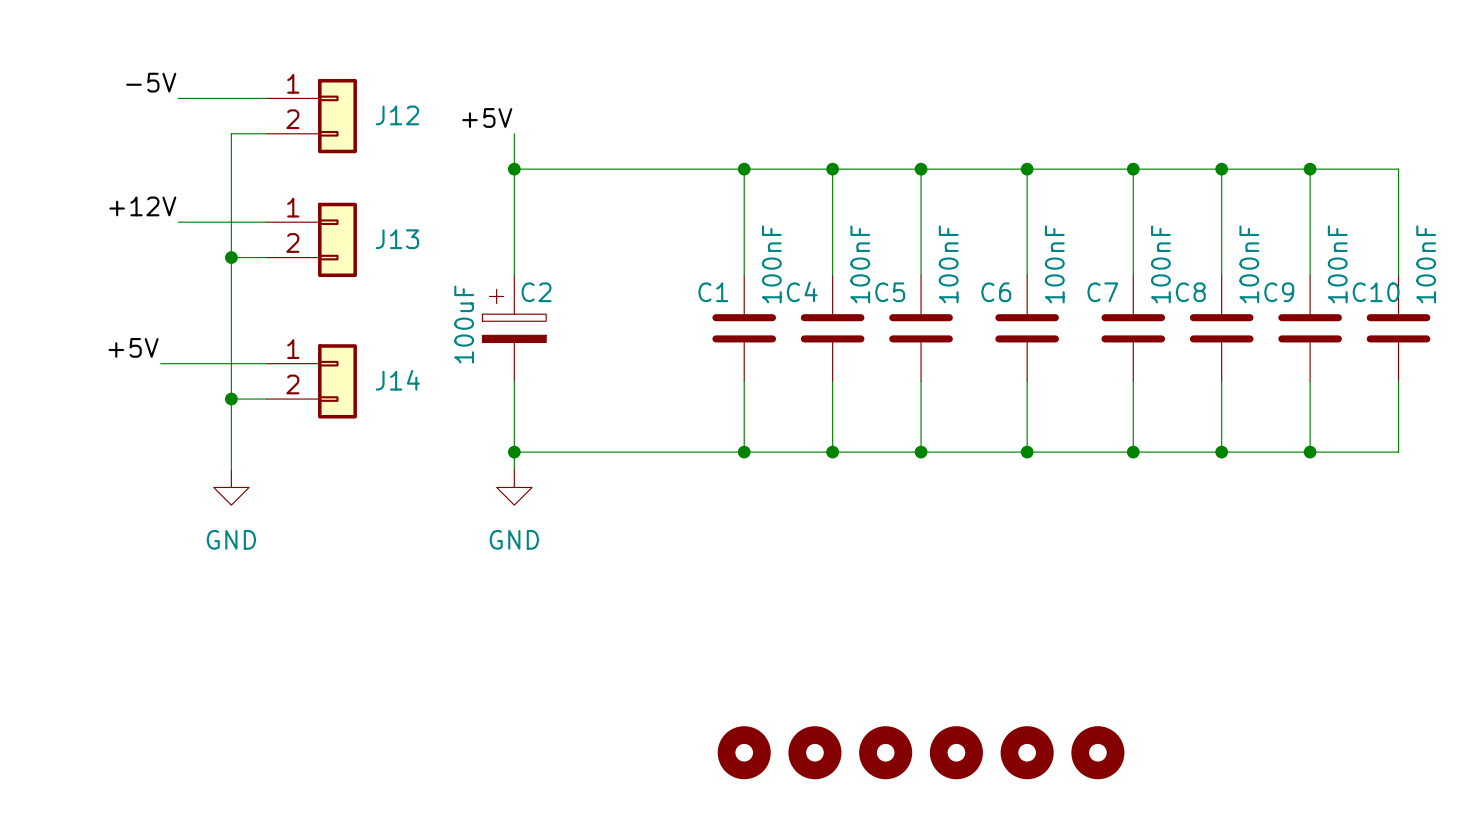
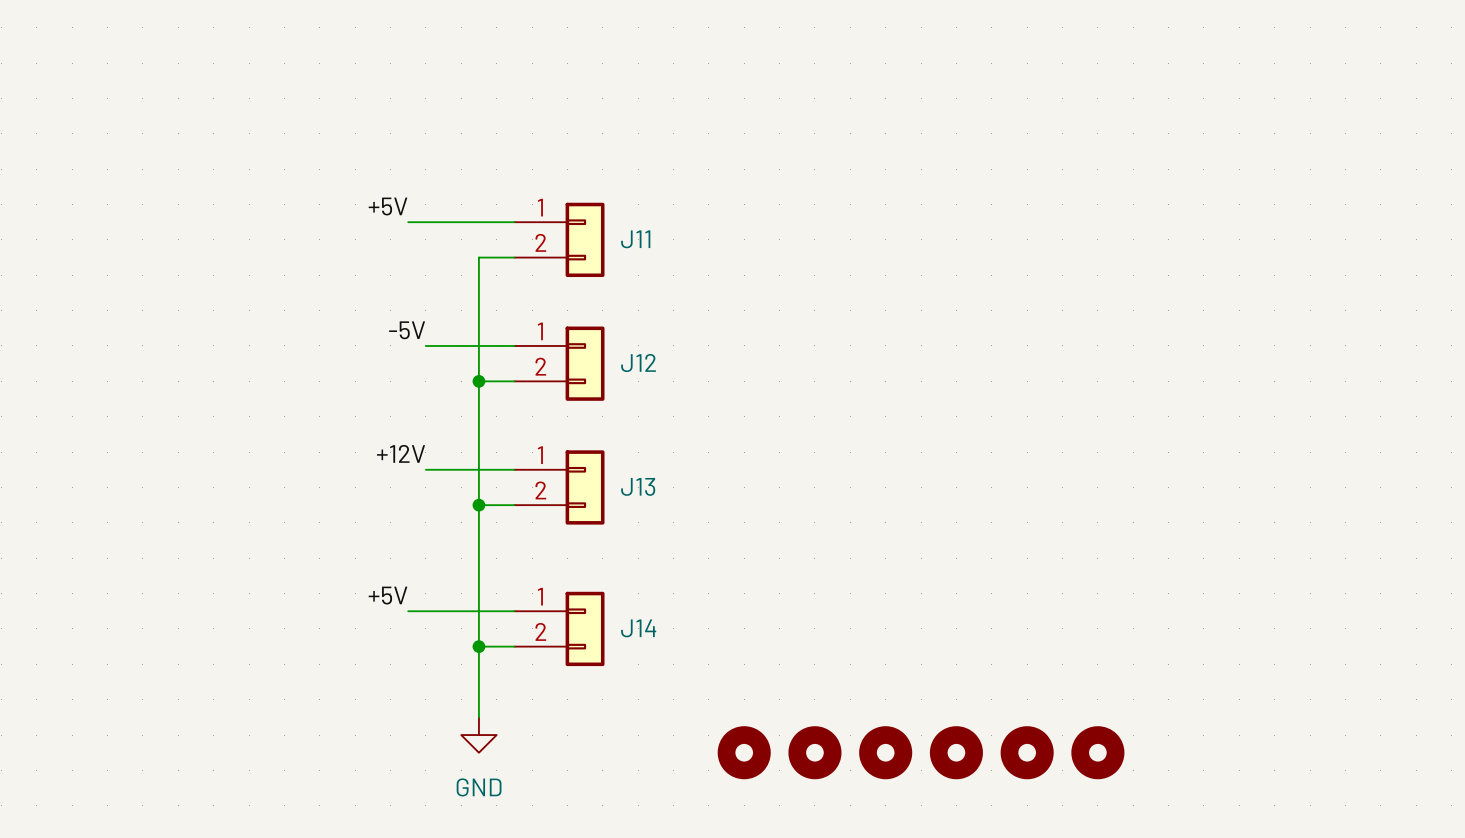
label: -5V (151, 82) -> none
wire: (178, 98) (266, 98) -> none
J12 position: (311, 116) -> (559, 363)
label position: +5V (487, 118) -> +5V (388, 206)
wire: (266, 133) (231, 133) (231, 469) -> none
wire: (514, 133) (514, 275) -> none
wire: (514, 169) (1398, 169) (1398, 275) -> none
junction: (514, 169) -> none
wire: (744, 169) (744, 275) -> none
junction: (744, 169) -> none
wire: (832, 169) (832, 275) -> none
junction: (832, 169) -> none
wire: (921, 169) (921, 275) -> none
junction: (921, 169) -> none
wire: (1027, 169) (1027, 275) -> none
junction: (1027, 169) -> none
wire: (1133, 169) (1133, 275) -> none
junction: (1133, 169) -> none
wire: (1221, 169) (1221, 275) -> none
junction: (1221, 169) -> none
wire: (1310, 169) (1310, 275) -> none
junction: (1310, 169) -> none
label: +12V (142, 206) -> none
wire: (178, 222) (266, 222) -> (425, 345) (514, 345)
J13 position: (311, 239) -> (559, 487)
J11: none -> (559, 239)
wire: (231, 257) (266, 257) -> none
junction: (231, 257) -> none
wire: none -> (514, 257) (478, 257) (478, 717)
C2: 100uF (514, 328) -> none
C1: 100nF (744, 328) -> none
C4: 100nF (832, 328) -> none
C5: 100nF (921, 328) -> none
C6: 100nF (1027, 328) -> none
C7: 100nF (1133, 328) -> none
C8: 100nF (1221, 328) -> none
C9: 100nF (1310, 328) -> none
C10: 100nF (1398, 328) -> none
label: none -> -5V (407, 330)
label: +5V (133, 347) -> none
wire: (160, 363) (266, 363) -> (408, 222) (514, 222)
J14 position: (311, 381) -> (559, 628)
junction: none -> (478, 381)
wire: (514, 381) (514, 469) -> (514, 381) (478, 381)
wire: (744, 381) (744, 452) -> none
wire: (832, 381) (832, 452) -> none
wire: (921, 381) (921, 452) -> none
wire: (1027, 381) (1027, 452) -> none
wire: (1133, 381) (1133, 452) -> none
wire: (1221, 381) (1221, 452) -> none
wire: (1310, 381) (1310, 452) -> none
wire: (1398, 381) (1398, 452) (514, 452) -> none
wire: (231, 399) (266, 399) -> (478, 505) (514, 505)
junction: (231, 399) -> none
junction: (514, 452) -> none
junction: (744, 452) -> none
junction: (832, 452) -> none
junction: (921, 452) -> none
junction: (1027, 452) -> none
junction: (1133, 452) -> none
junction: (1221, 452) -> none
junction: (1310, 452) -> none
label: none -> +12V (401, 453)
wire: none -> (425, 469) (514, 469)
power symbol: GND (231, 487) -> none
power symbol: GND (514, 487) -> none
junction: none -> (478, 505)
label: none -> +5V (388, 595)
wire: none -> (408, 611) (514, 611)
wire: none -> (478, 646) (514, 646)
junction: none -> (478, 646)
power symbol: none -> GND (478, 735)

